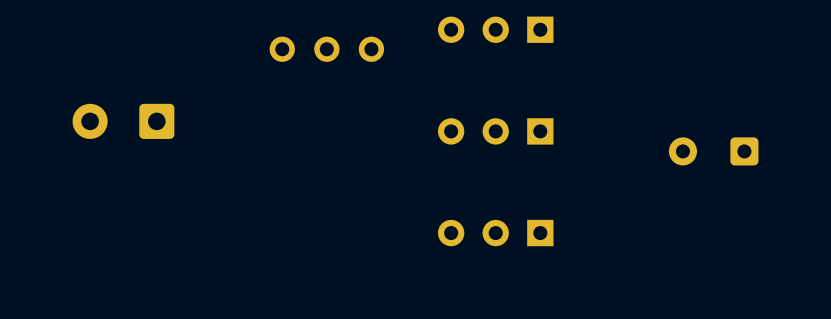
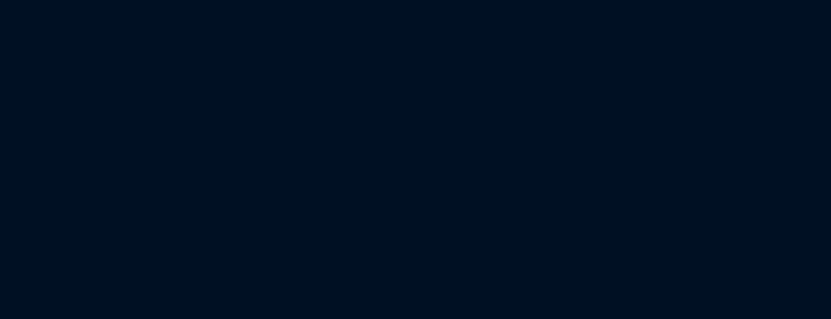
part: (495, 29) -> none
part: (326, 49) -> none
part: (123, 121) -> none
part: (495, 131) -> none
part: (713, 151) -> none
part: (495, 233) -> none

